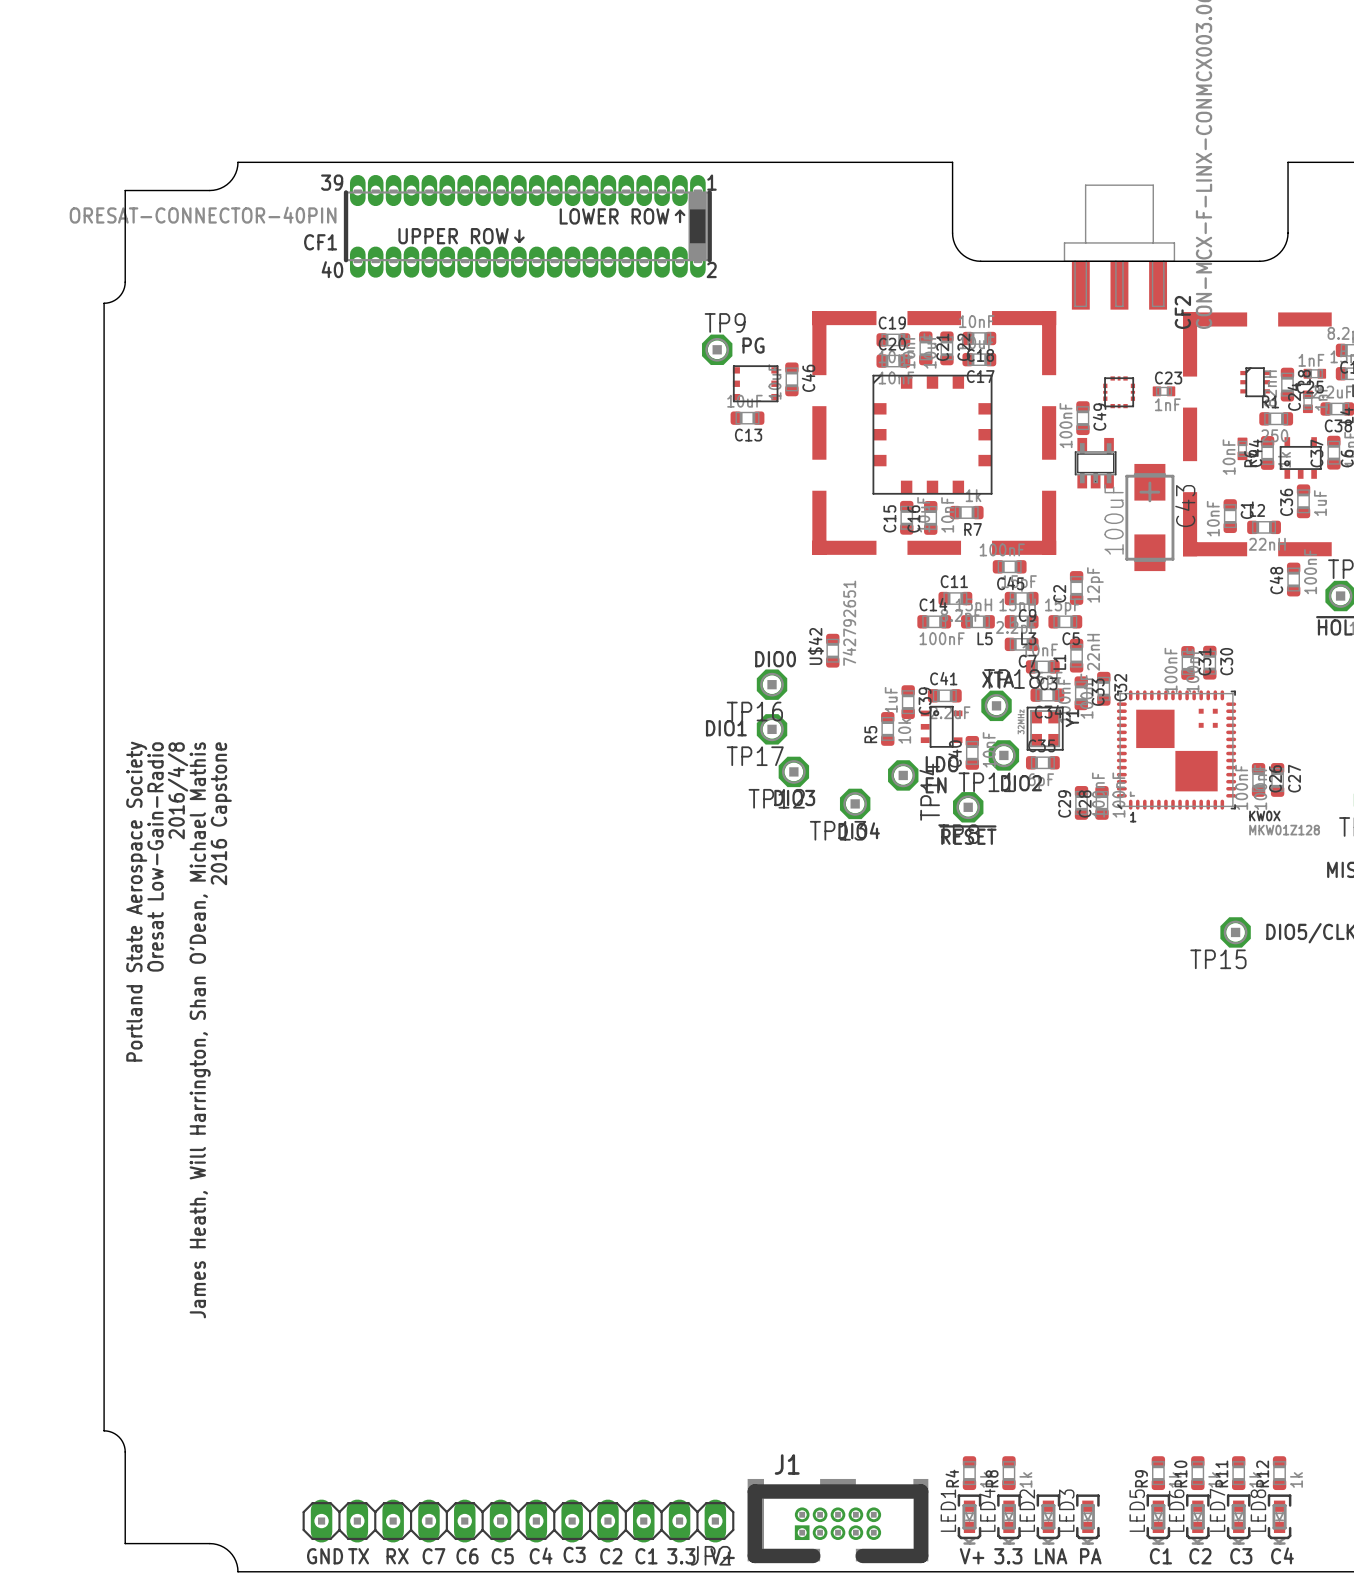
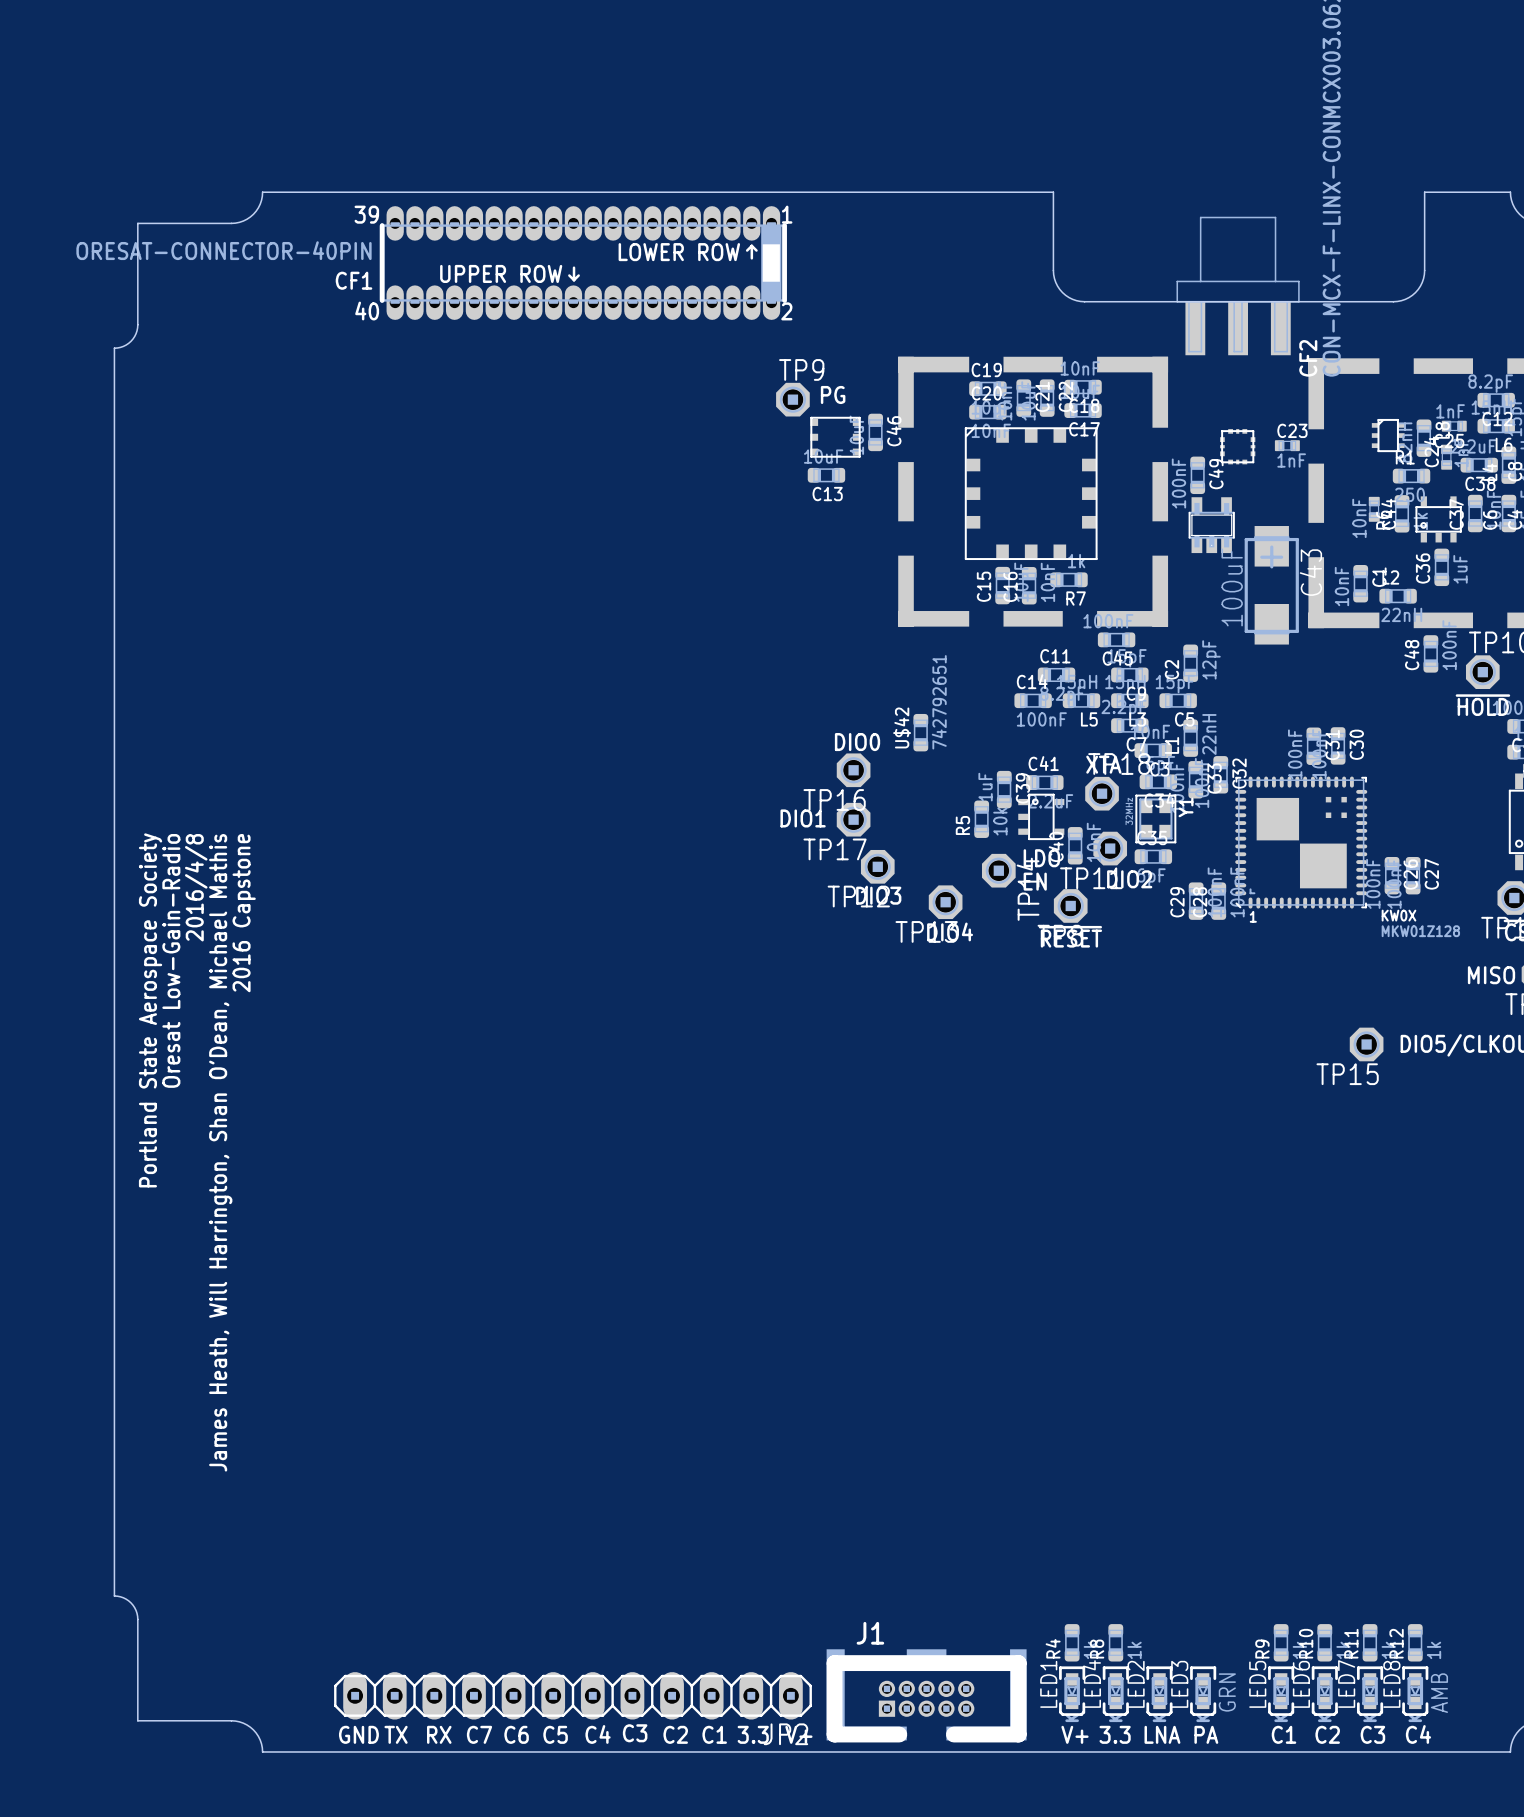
LED3 value: none -> GRN (1227, 1692)
LED8 value: none -> AMB (1439, 1693)

